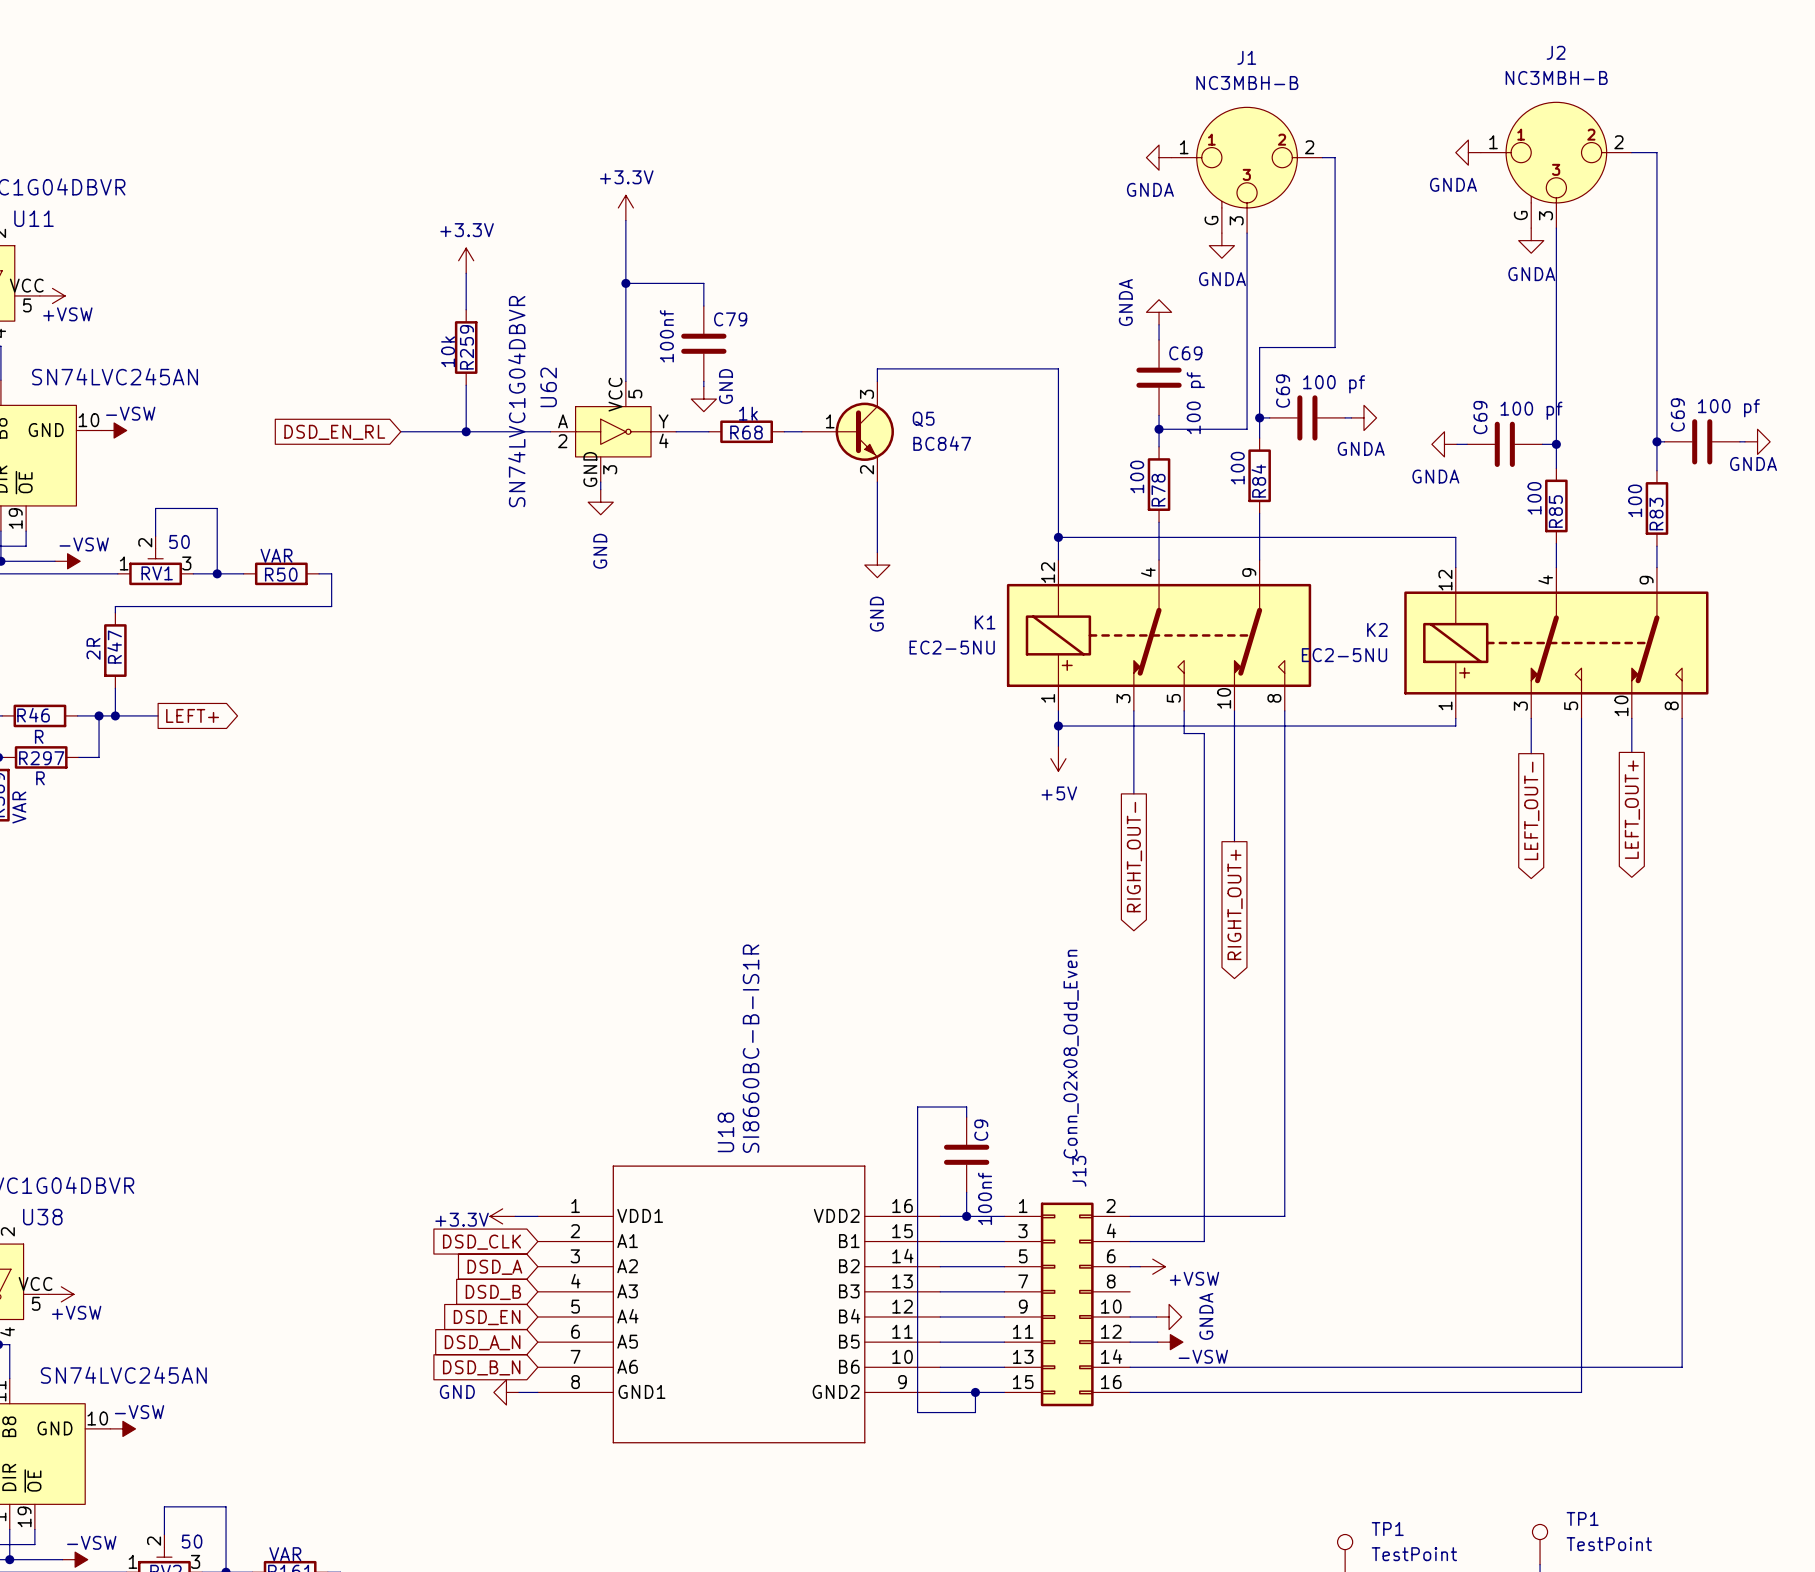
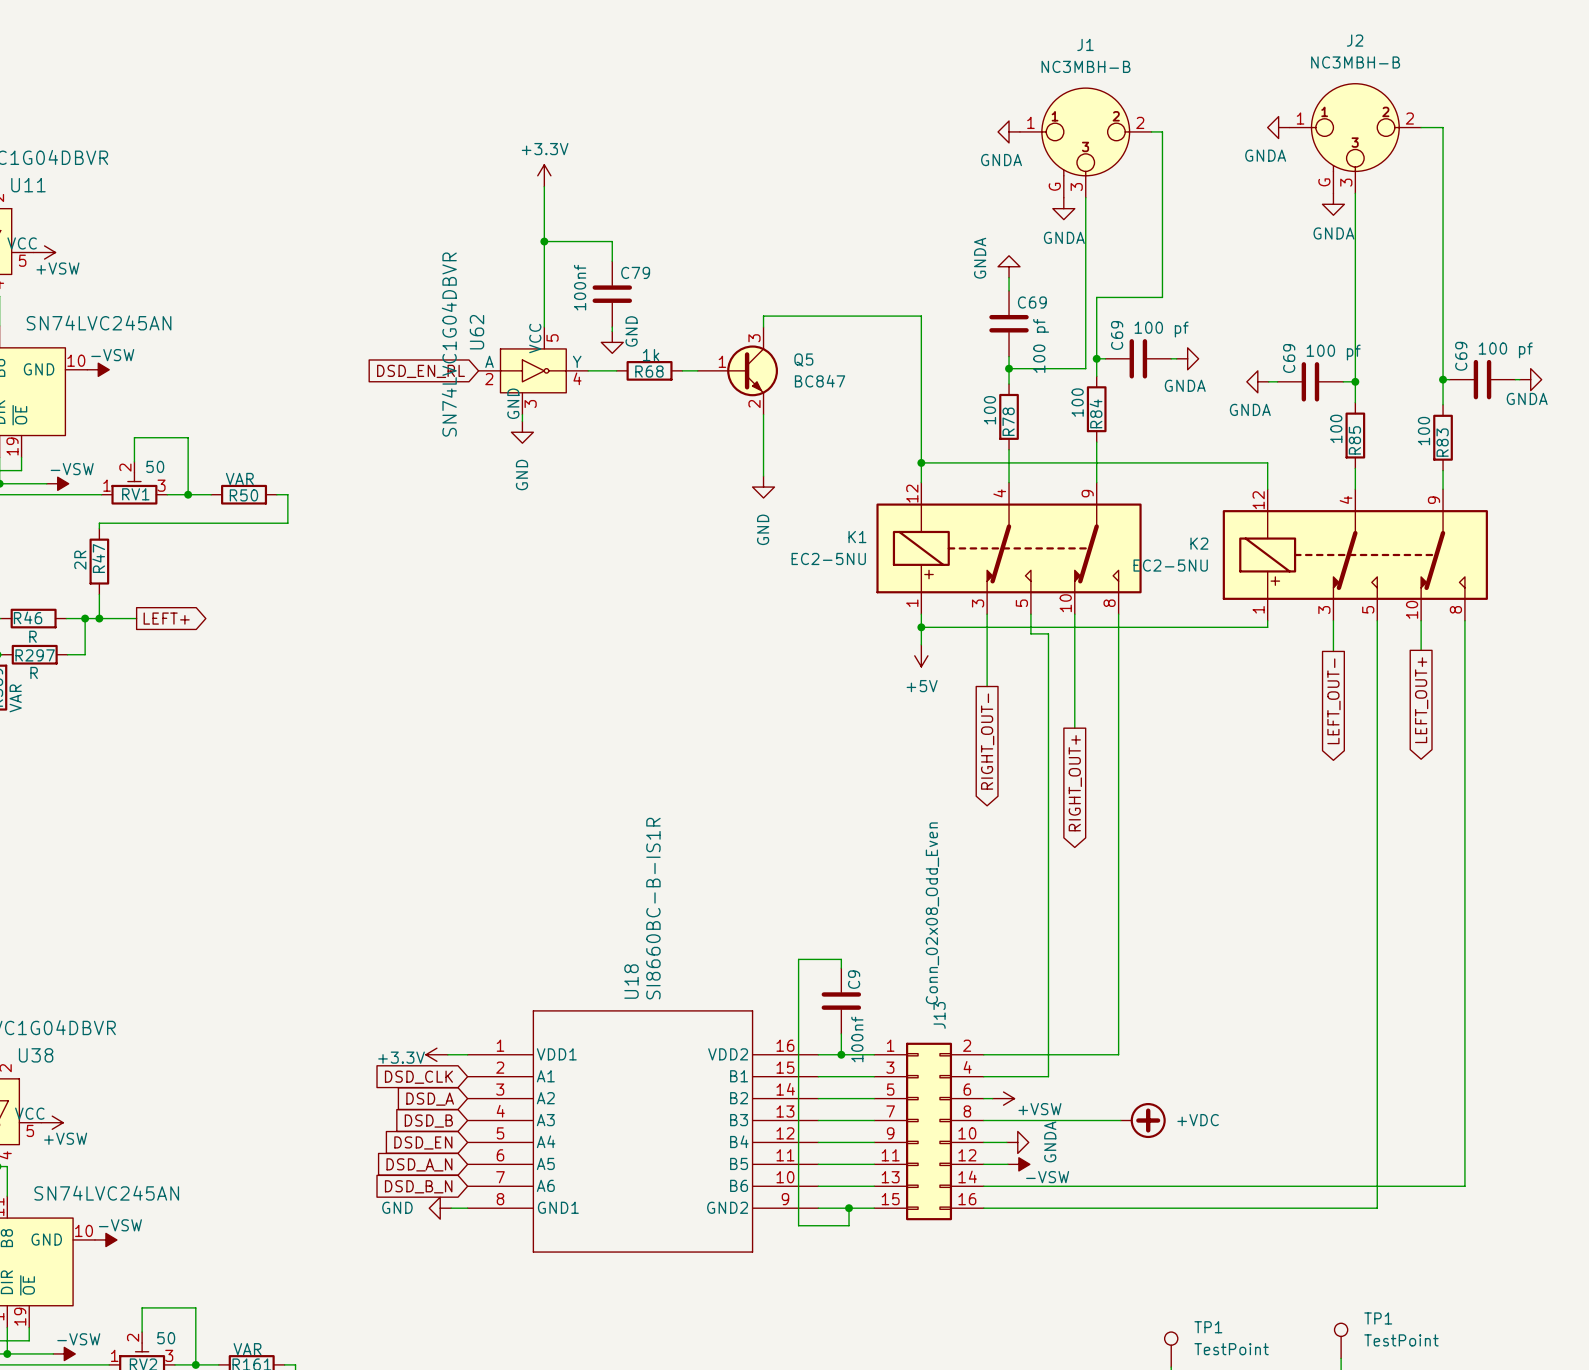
power symbol: +3.3V (466, 260) -> none
wire: (466, 273) (466, 309) -> none
R259: 10k (466, 347) -> none
wire: (466, 385) (466, 431) -> none
wire: (400, 431) (550, 431) -> none
junction: (466, 431) -> none
global label position: DSD_EN_RL (334, 432) -> DSD_EN_RL (421, 371)
wire: none -> (983, 1120) (1120, 1120)
power symbol: none -> +VDC (1143, 1120)

